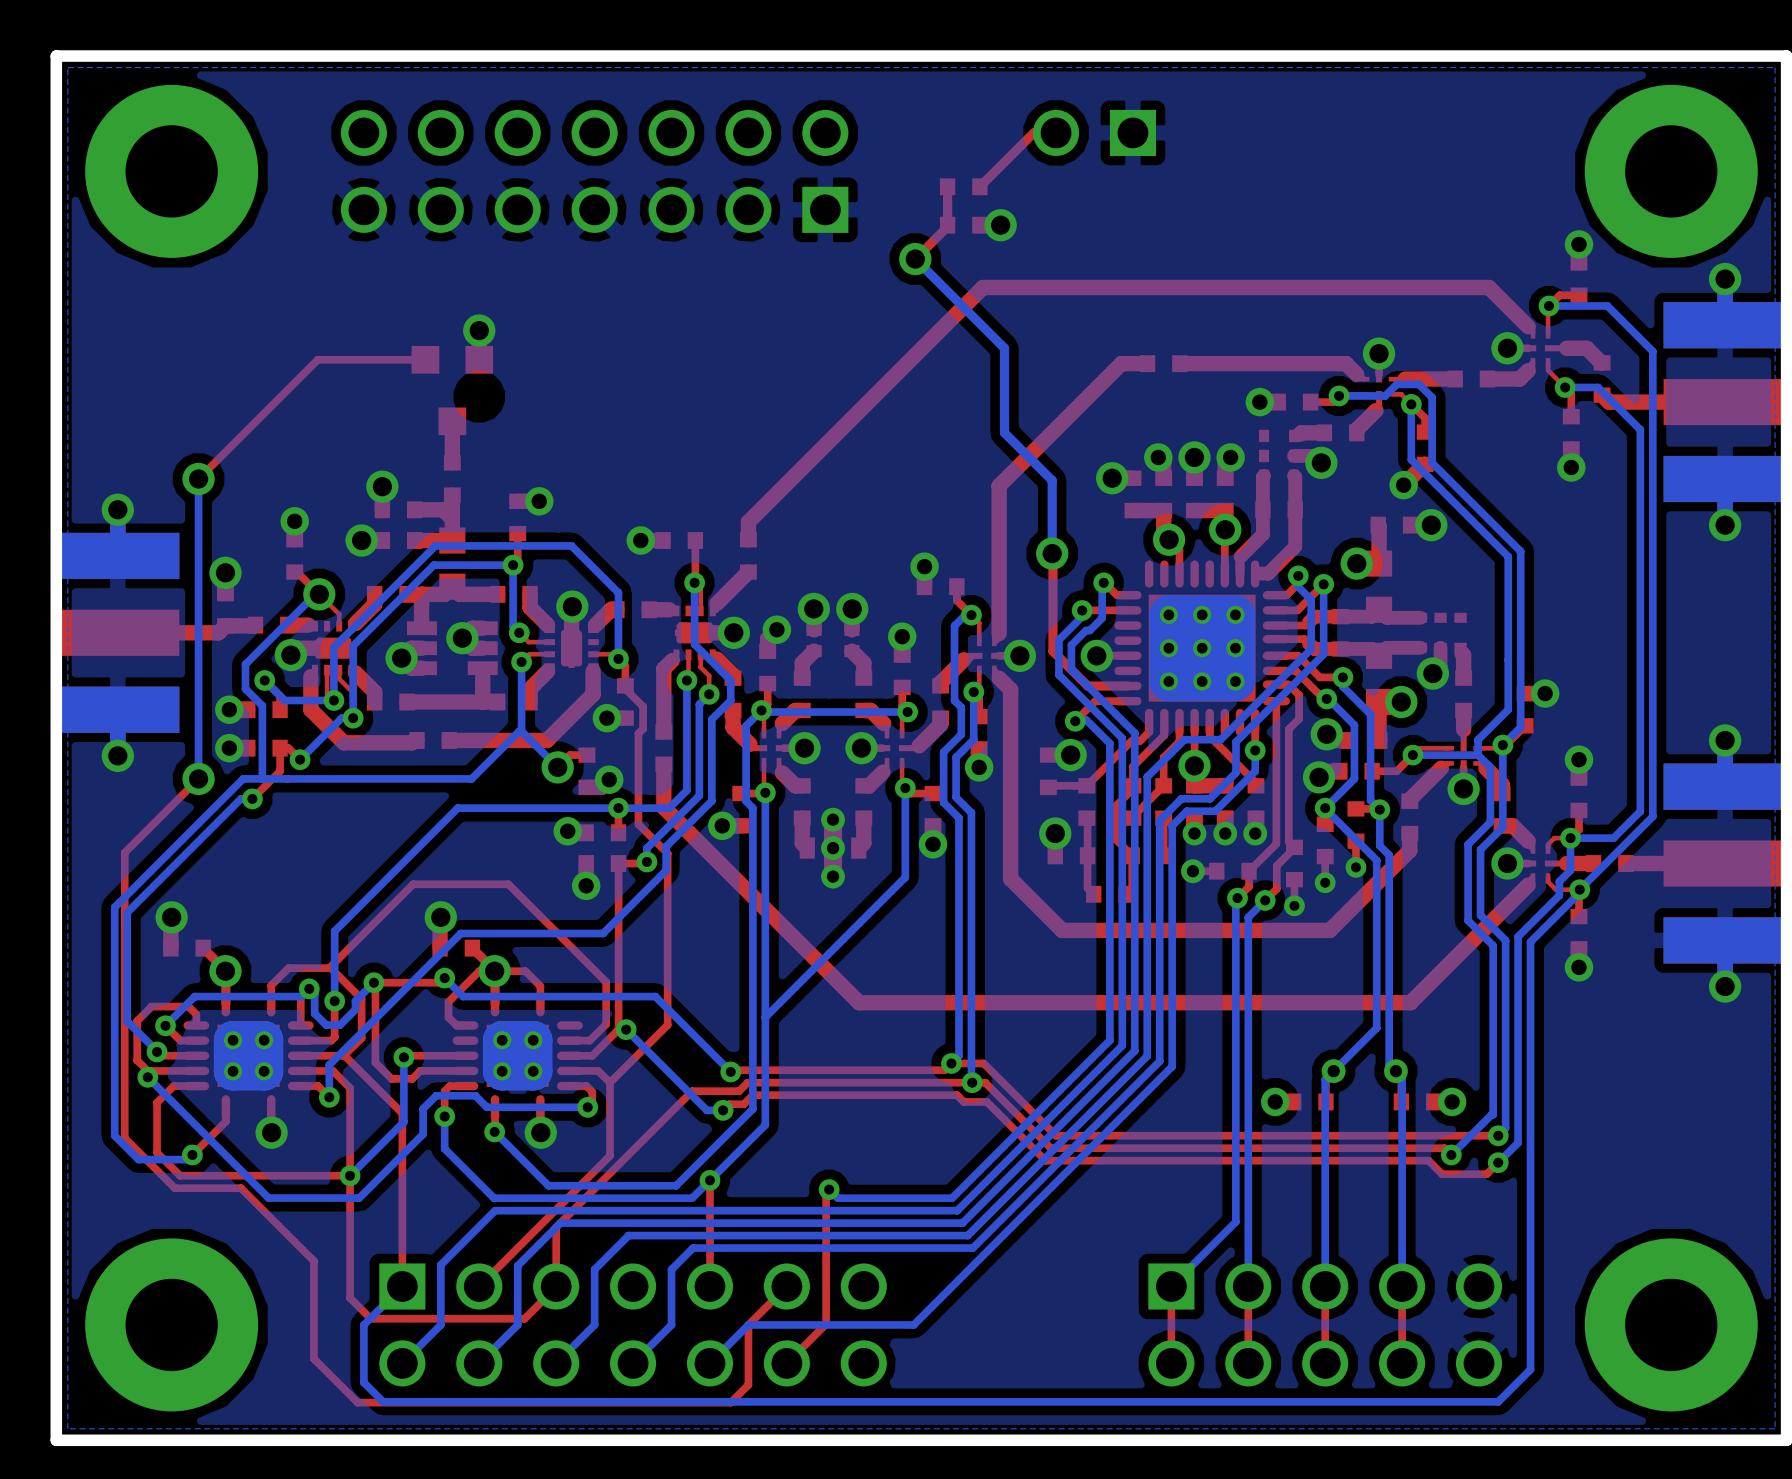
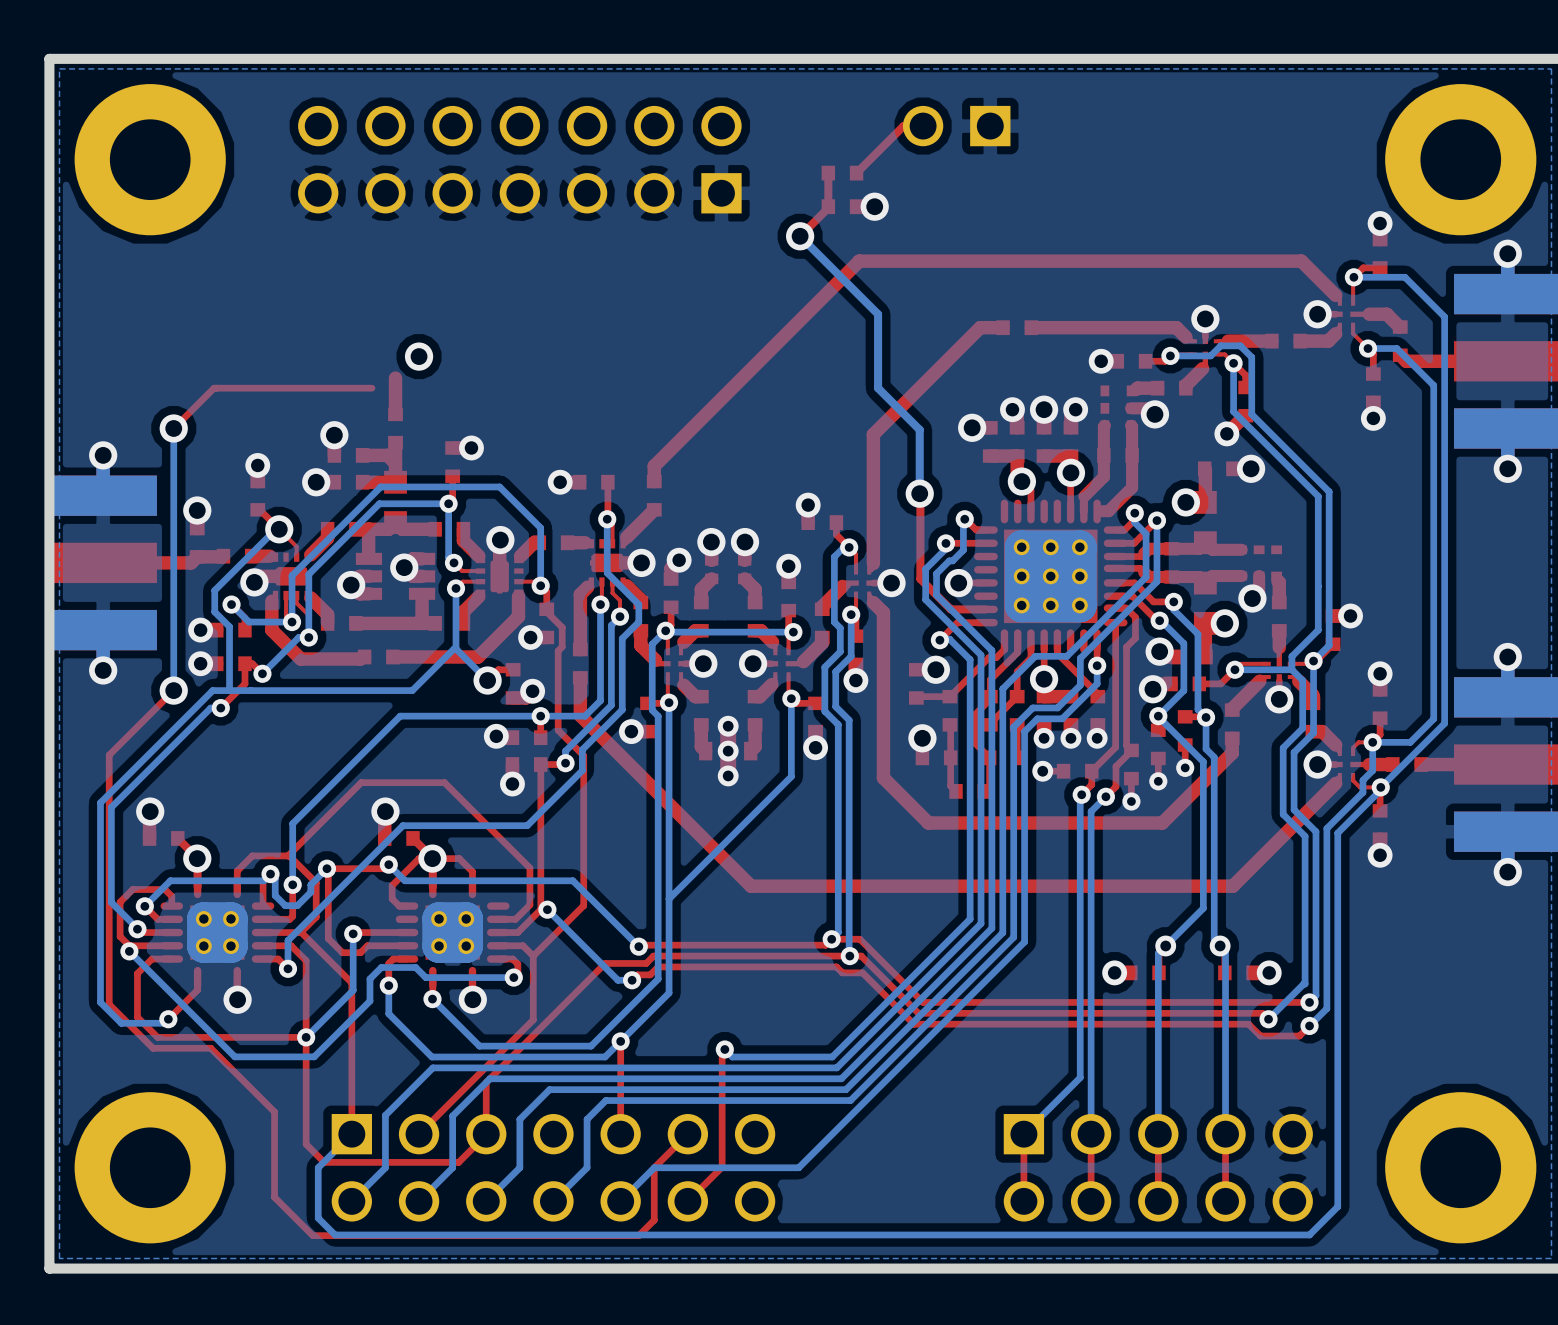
via position: (479, 330) -> (419, 356)
top track: (425, 359) (317, 359) (244, 432) -> (372, 388) (214, 388)
part: (452, 390) -> none

